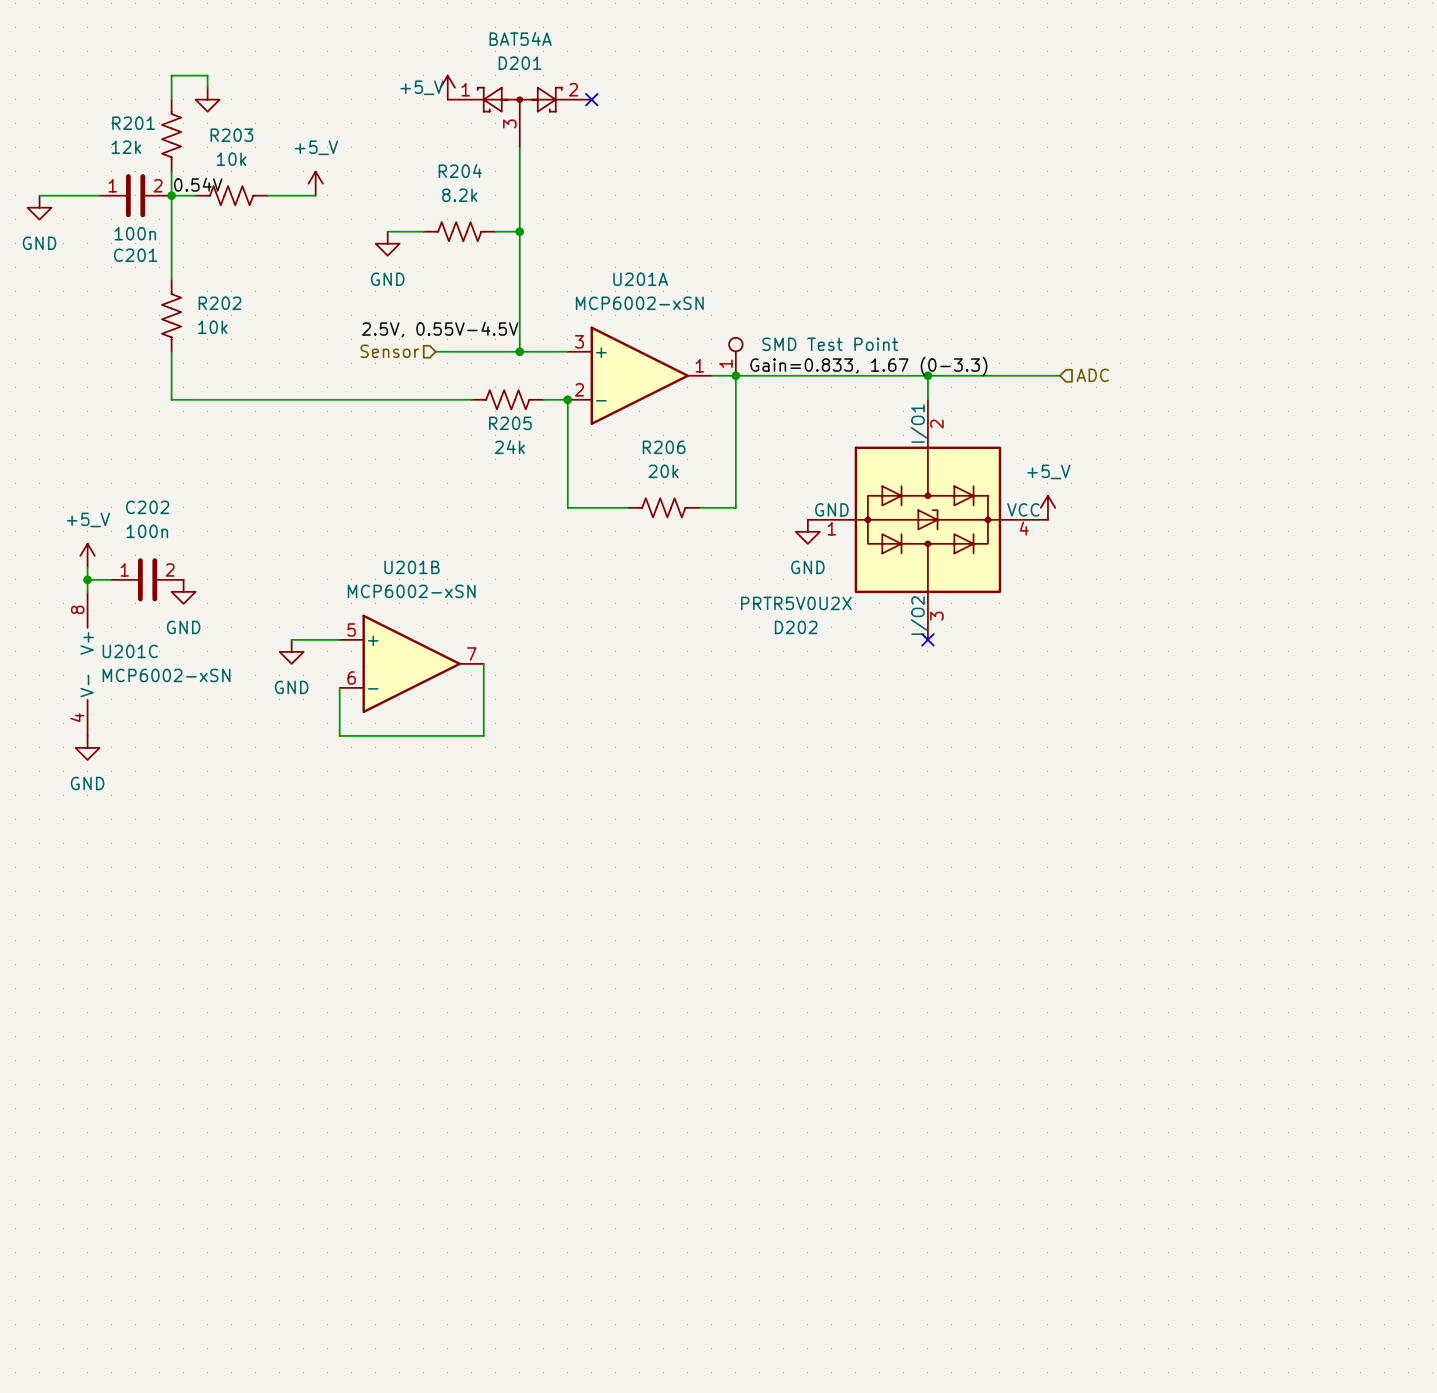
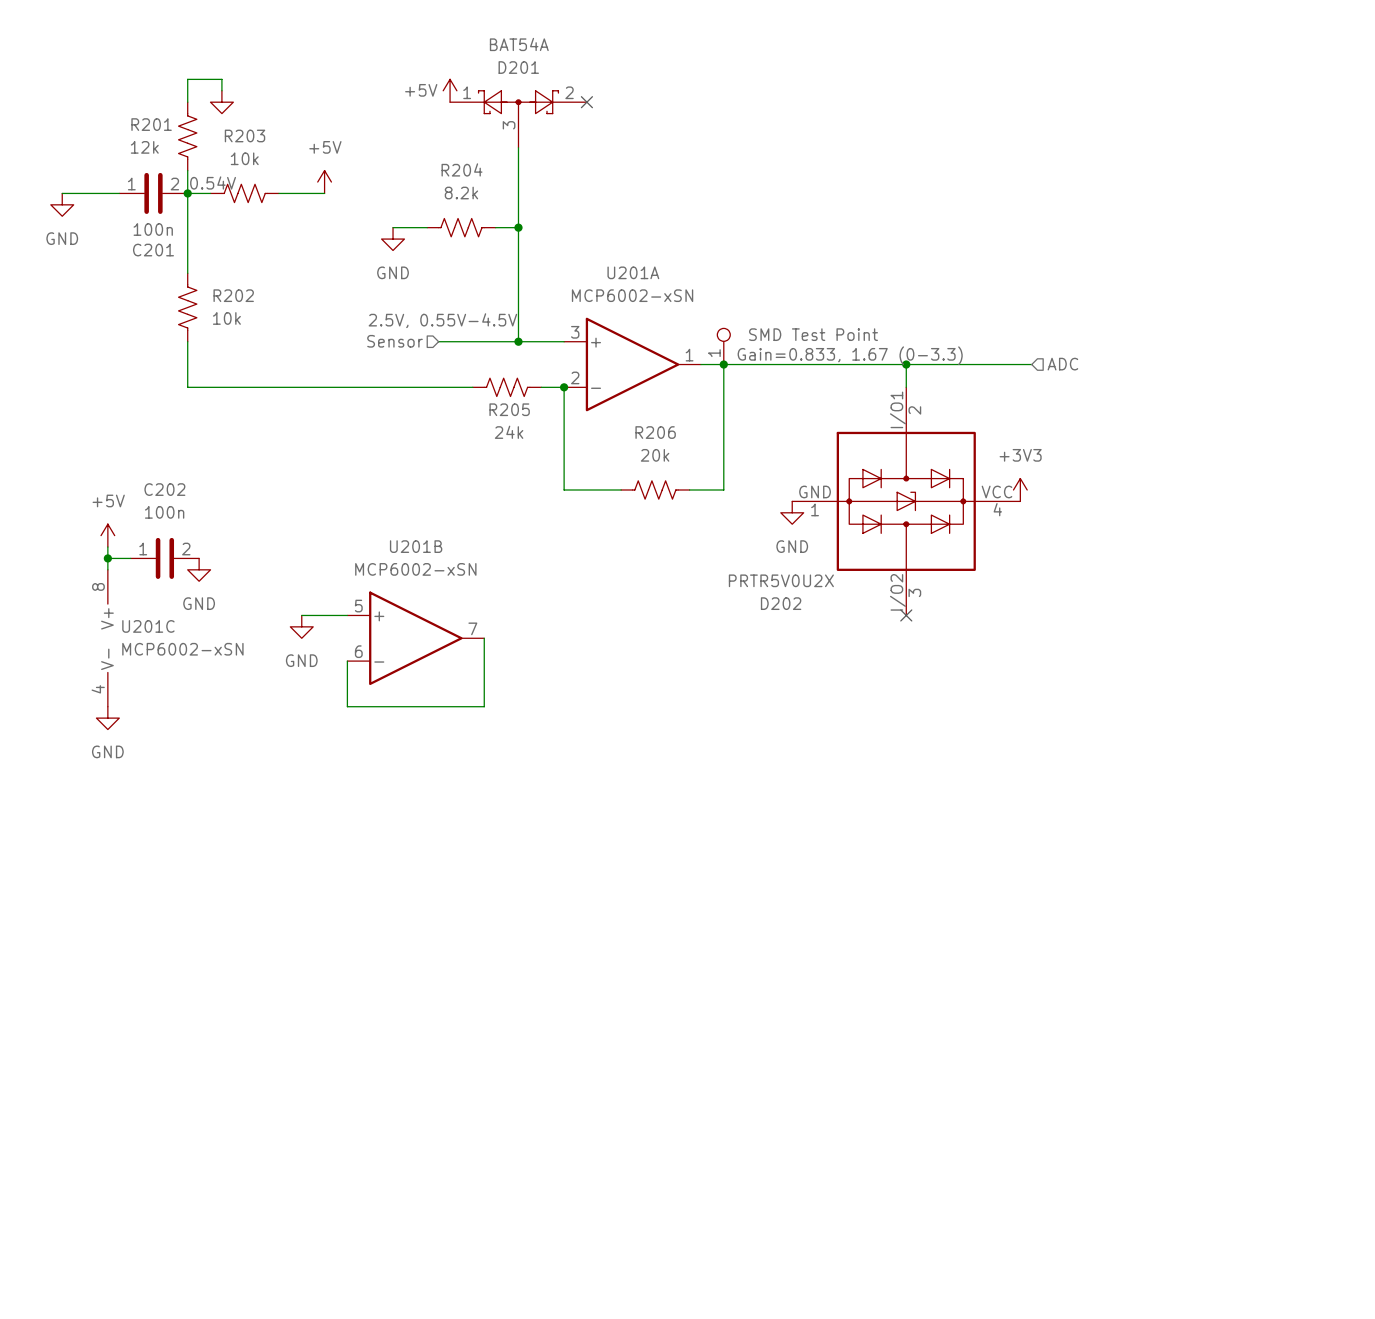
power symbol: +5_V (447, 87) -> +5V (450, 90)
power symbol: +5_V (315, 183) -> +5V (324, 182)
power symbol: +5_V (1047, 507) -> +3V3 (1020, 489)
power symbol: +5_V (87, 555) -> +5V (107, 535)

